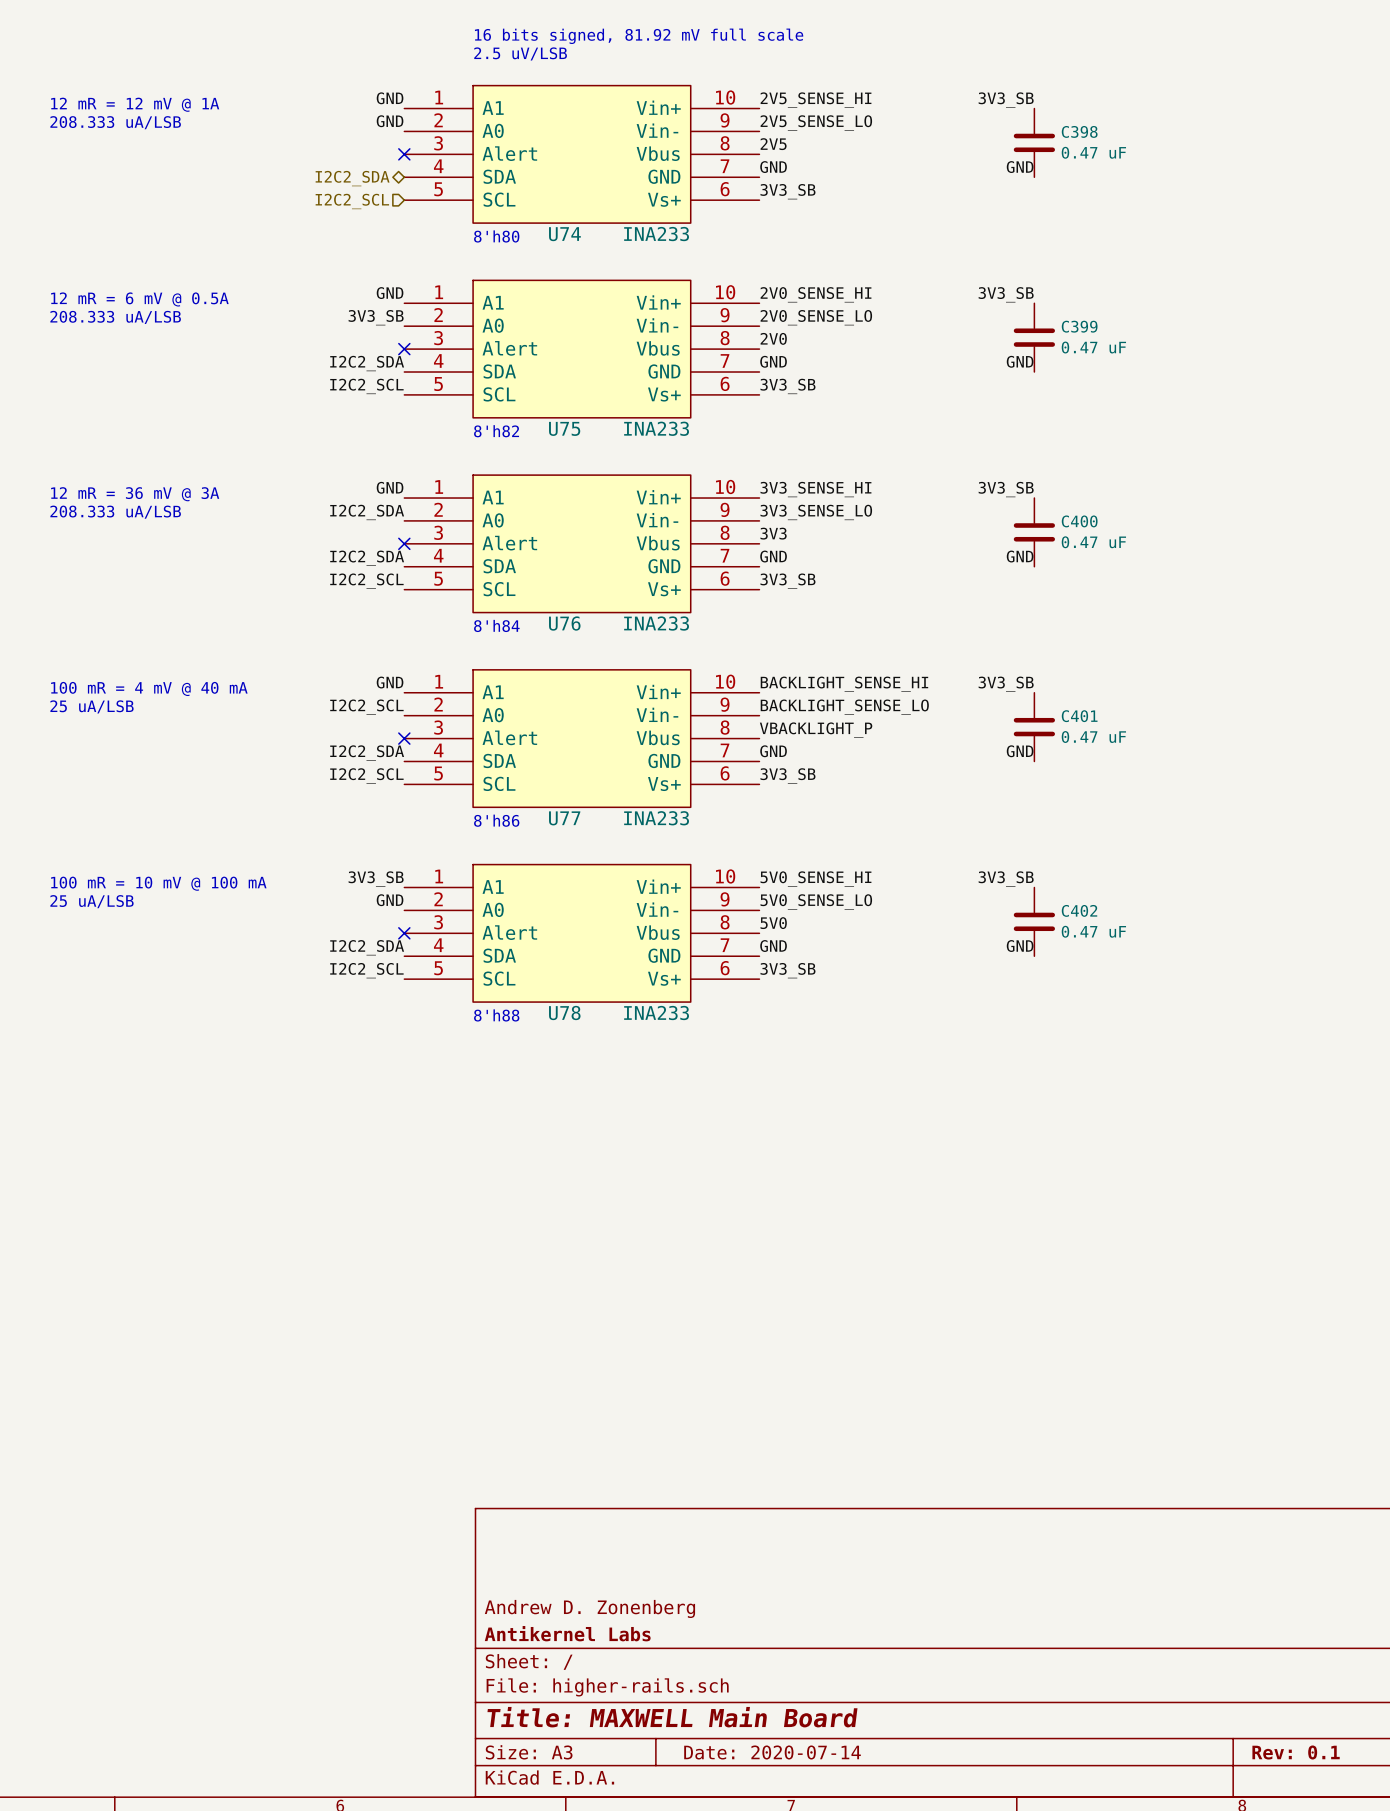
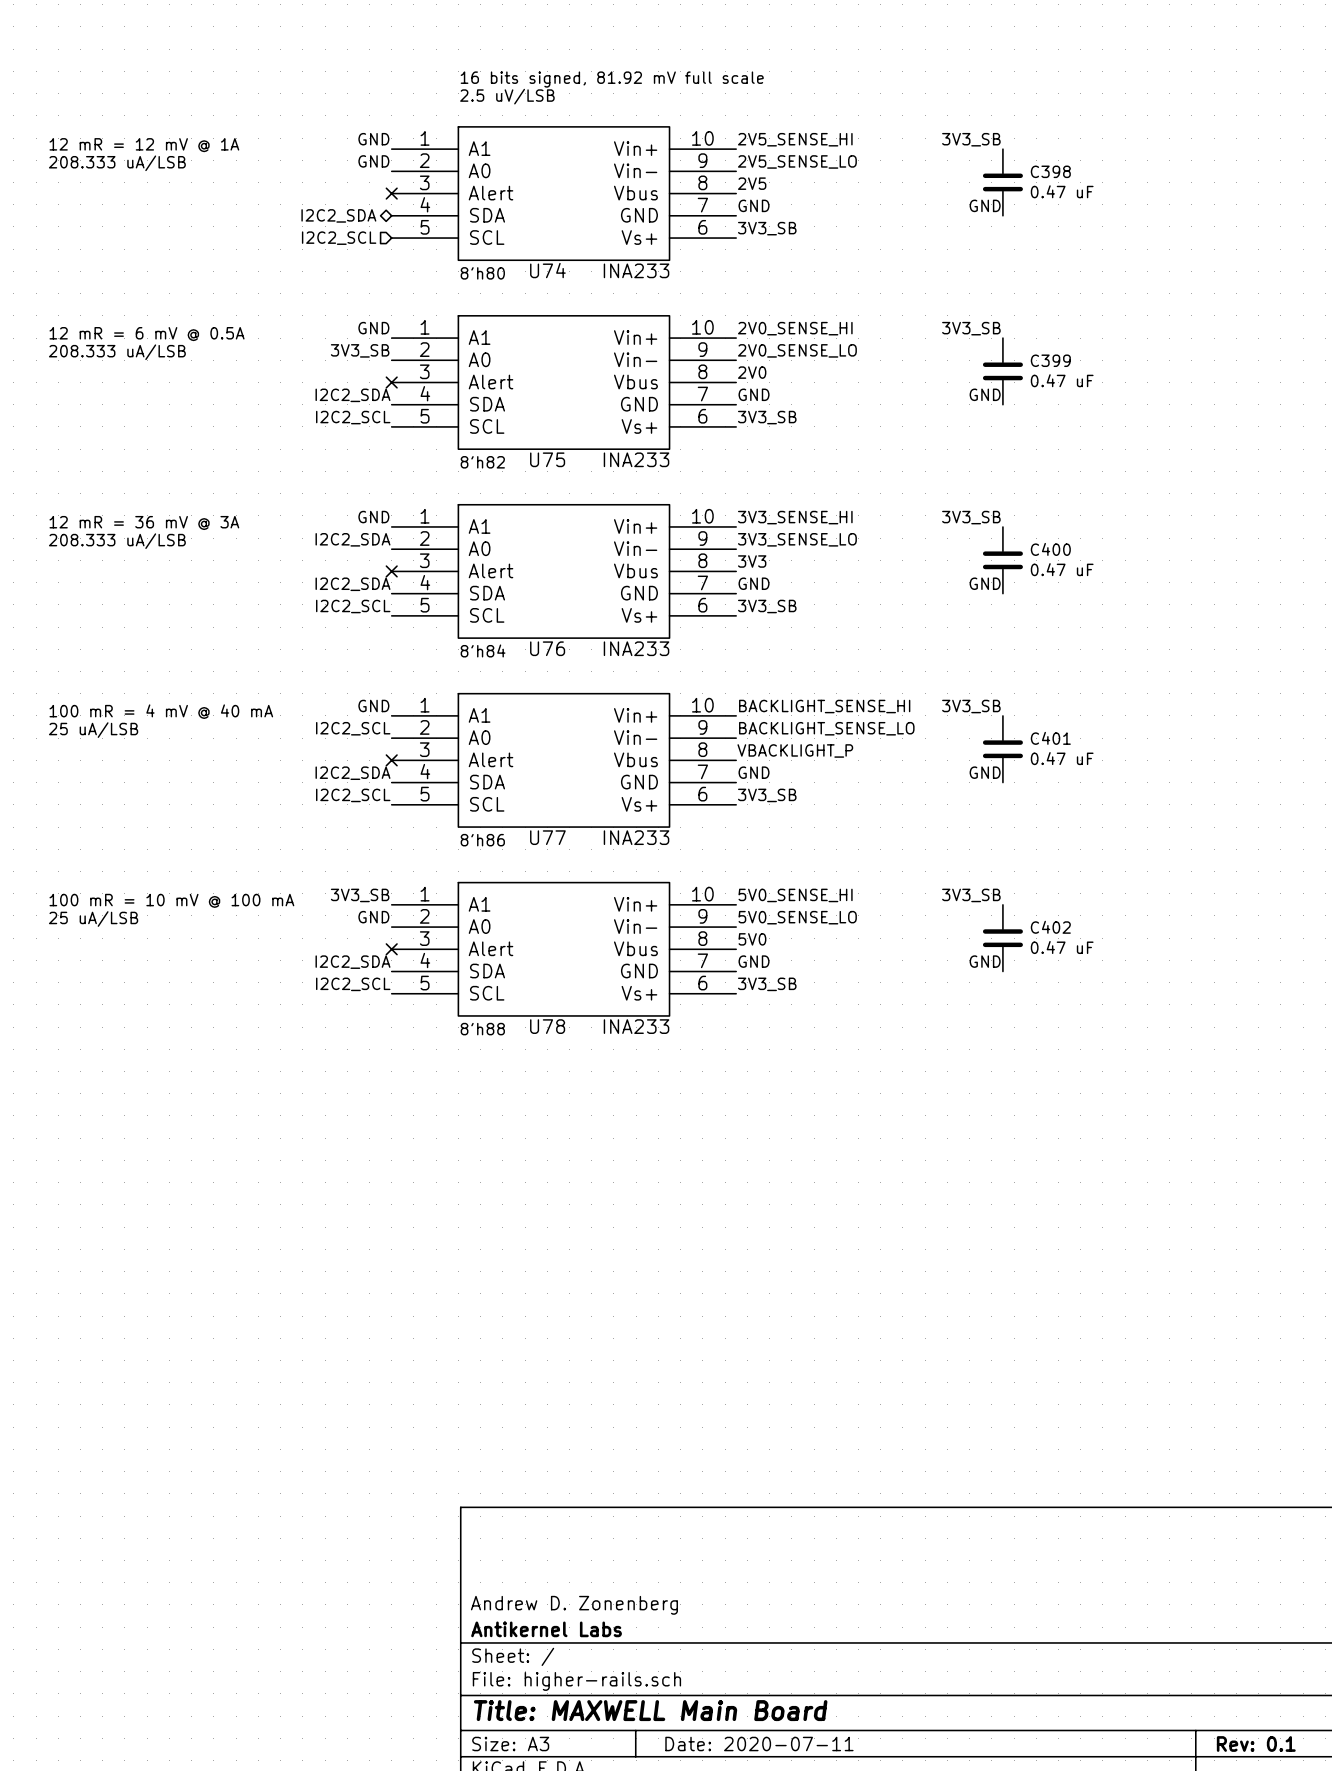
title block: Date: 2020-07-14 (772, 1752) -> Date: 2020-07-11 (759, 1744)

